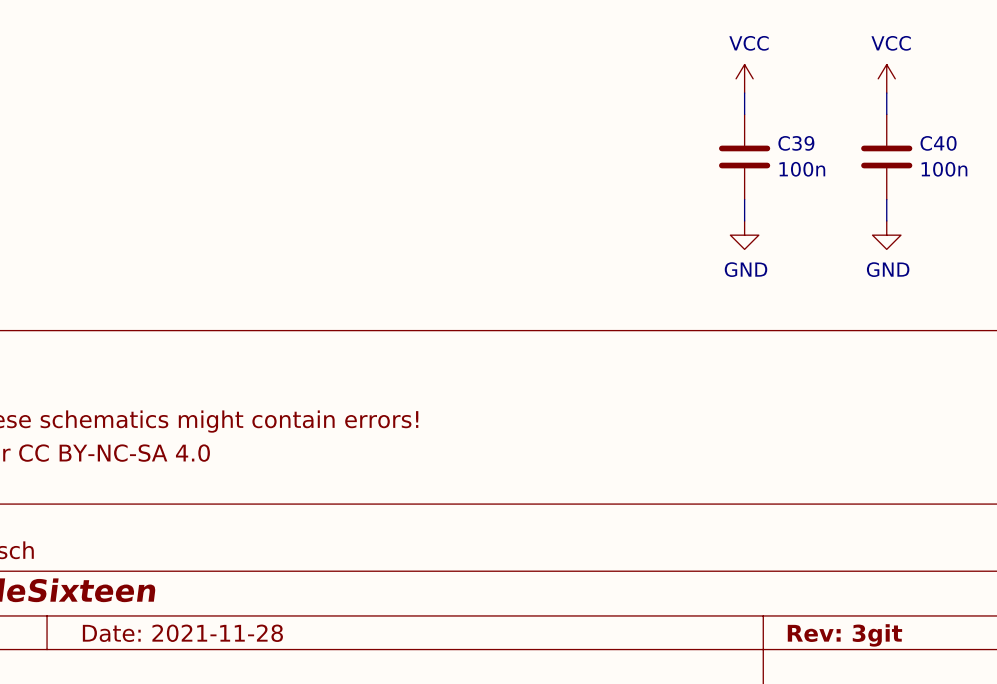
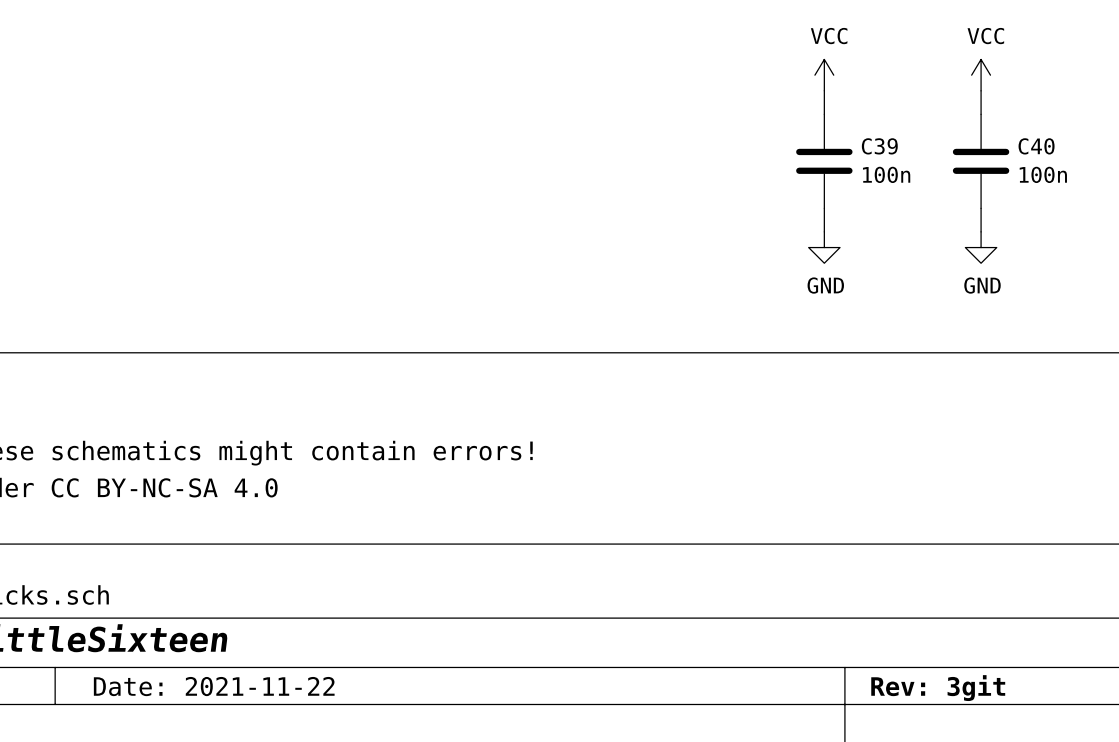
title block: Date: 2021-11-28 (182, 633) -> Date: 2021-11-22 (214, 686)

